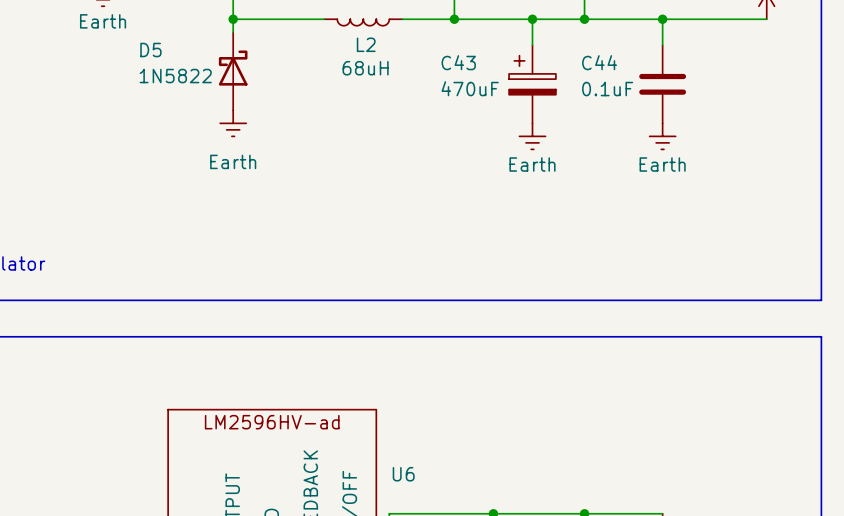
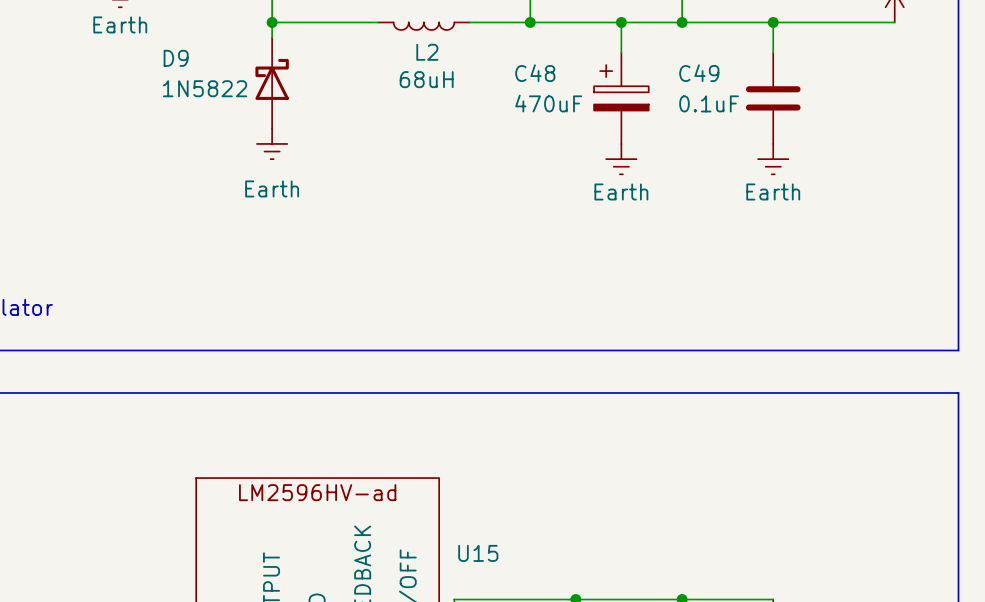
D5 name: D5 (150, 50) -> D9 (176, 58)
C43 name: C43 (458, 62) -> C48 (535, 73)
C44 name: C44 (599, 62) -> C49 (699, 73)
U6 name: U6 (403, 474) -> U15 (478, 553)

